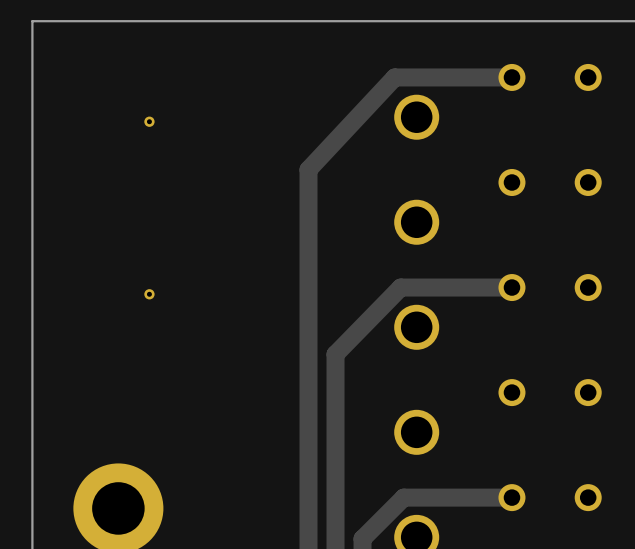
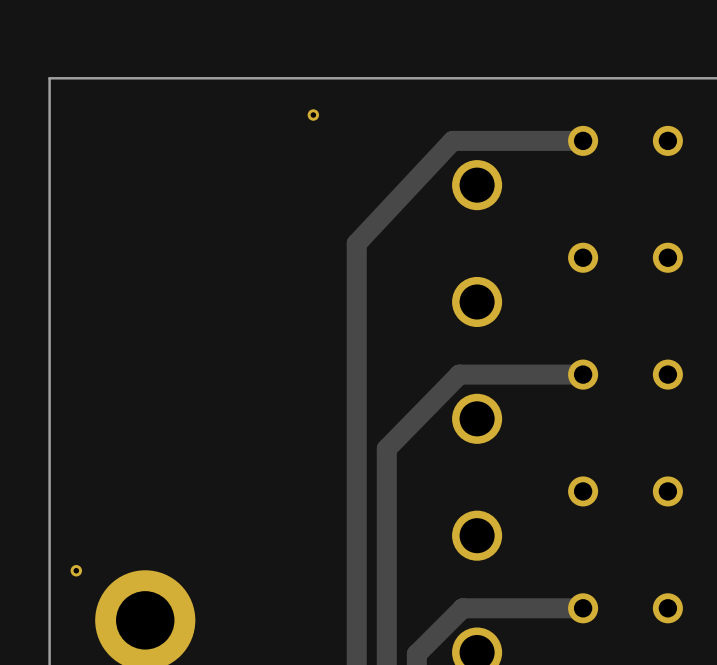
part: none -> (313, 115)
part: (149, 121) -> none
part: (149, 294) -> none
part: none -> (76, 570)

